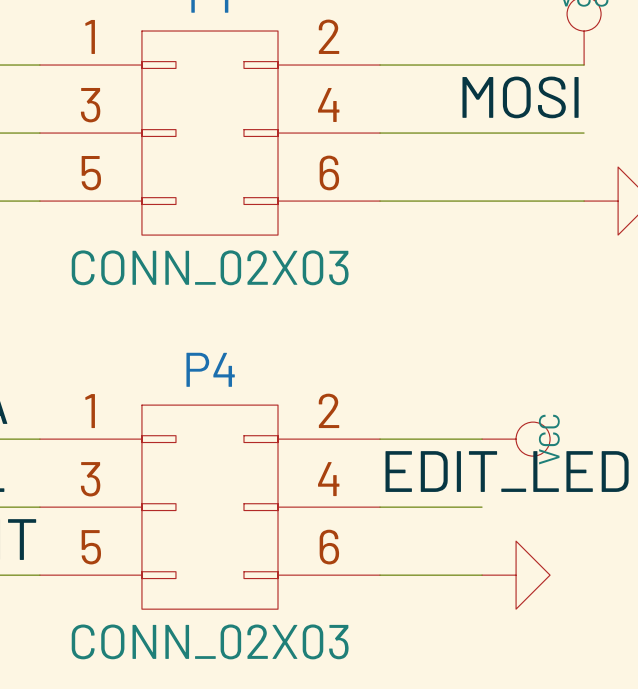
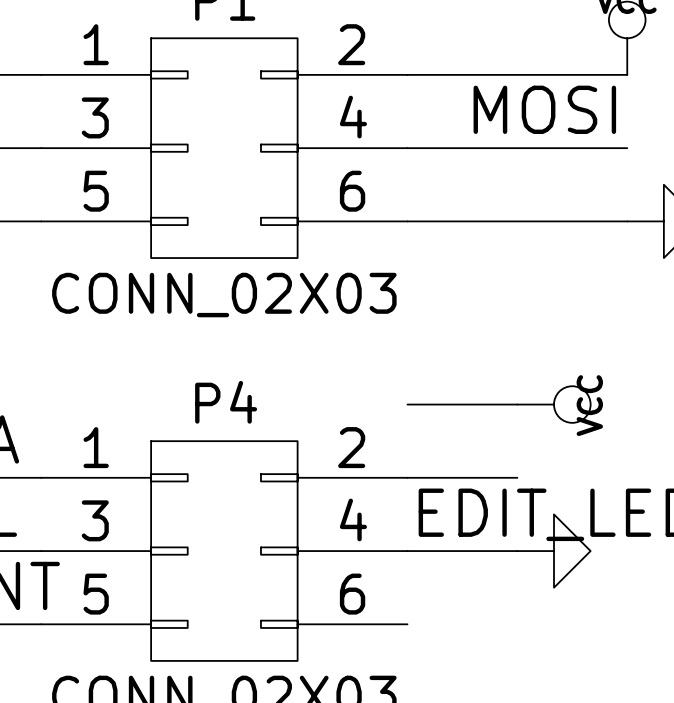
power symbol position: VCC (516, 439) -> VCC (554, 404)
wire: (380, 575) (482, 575) -> (407, 404) (517, 404)
power symbol position: (516, 575) -> (554, 551)

